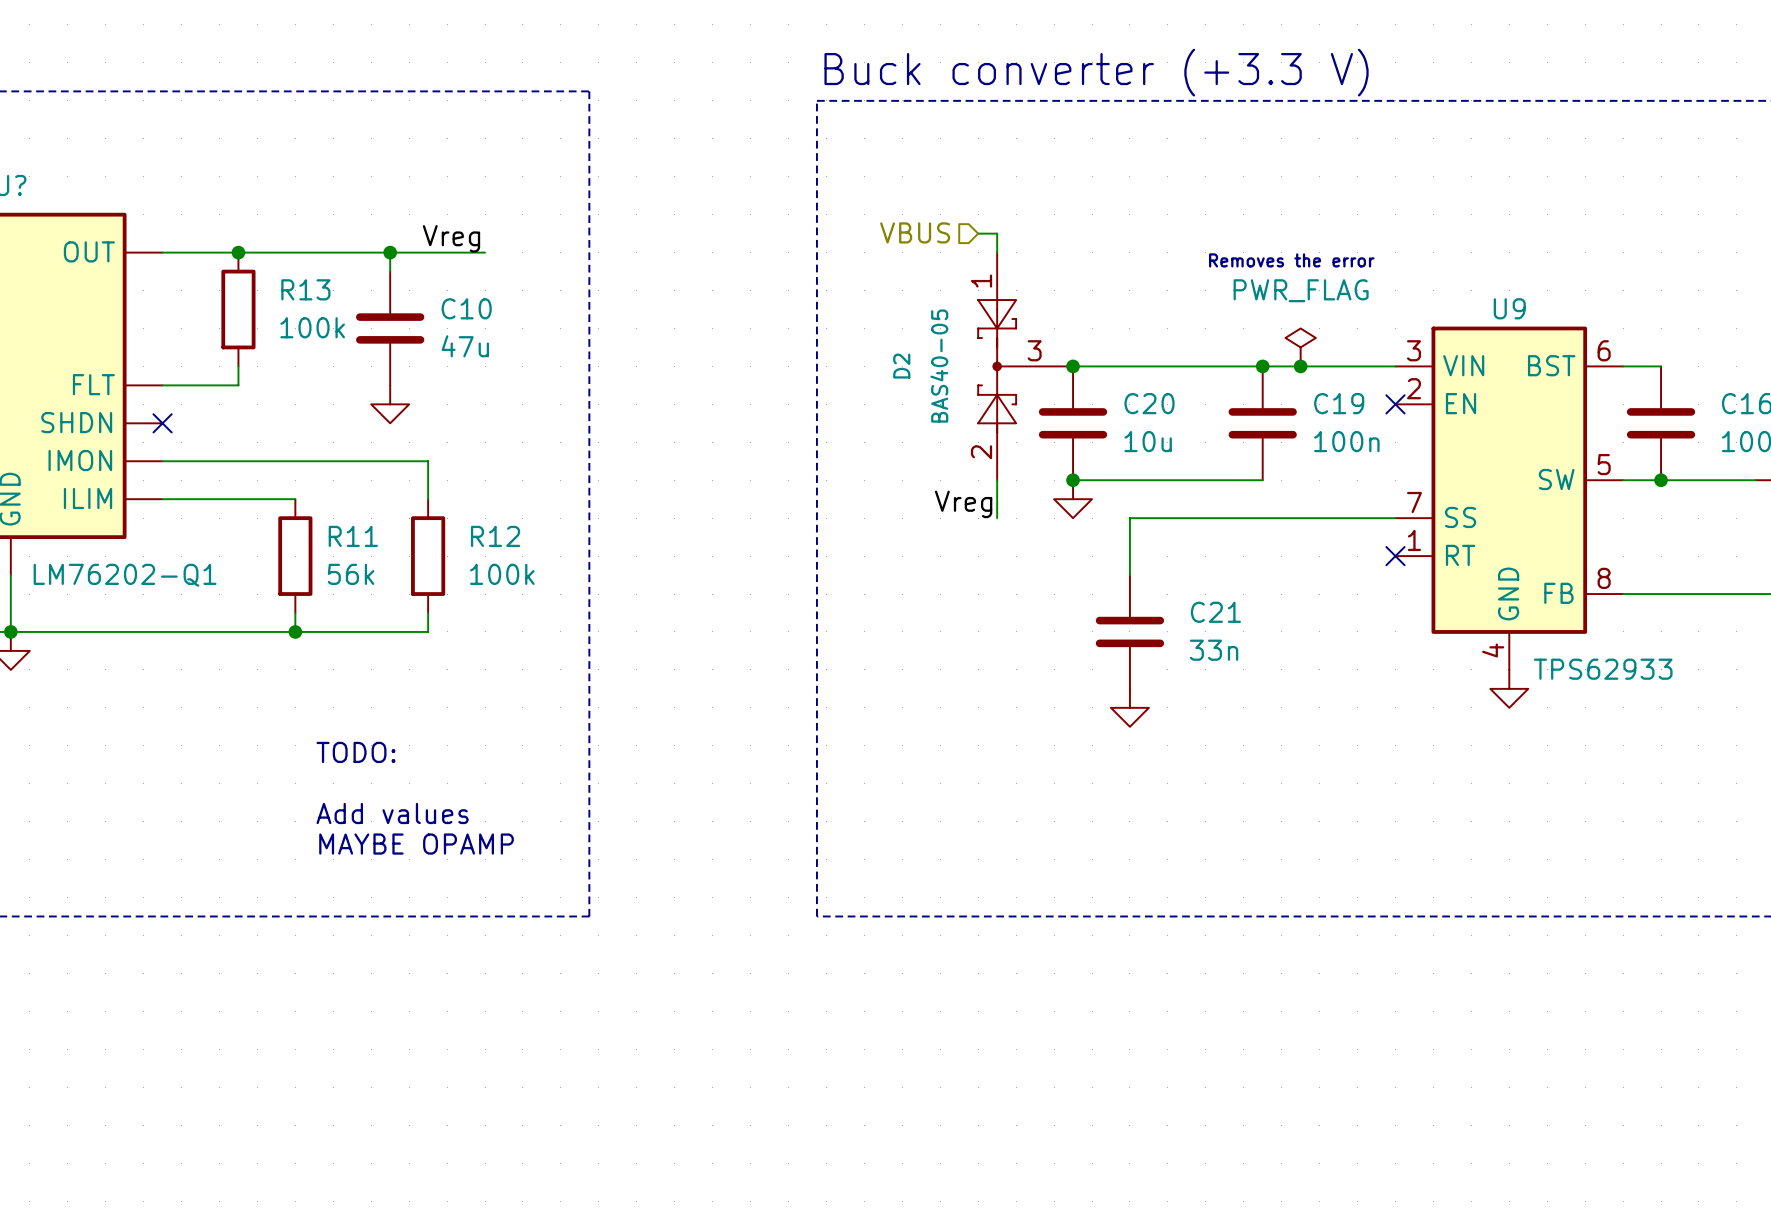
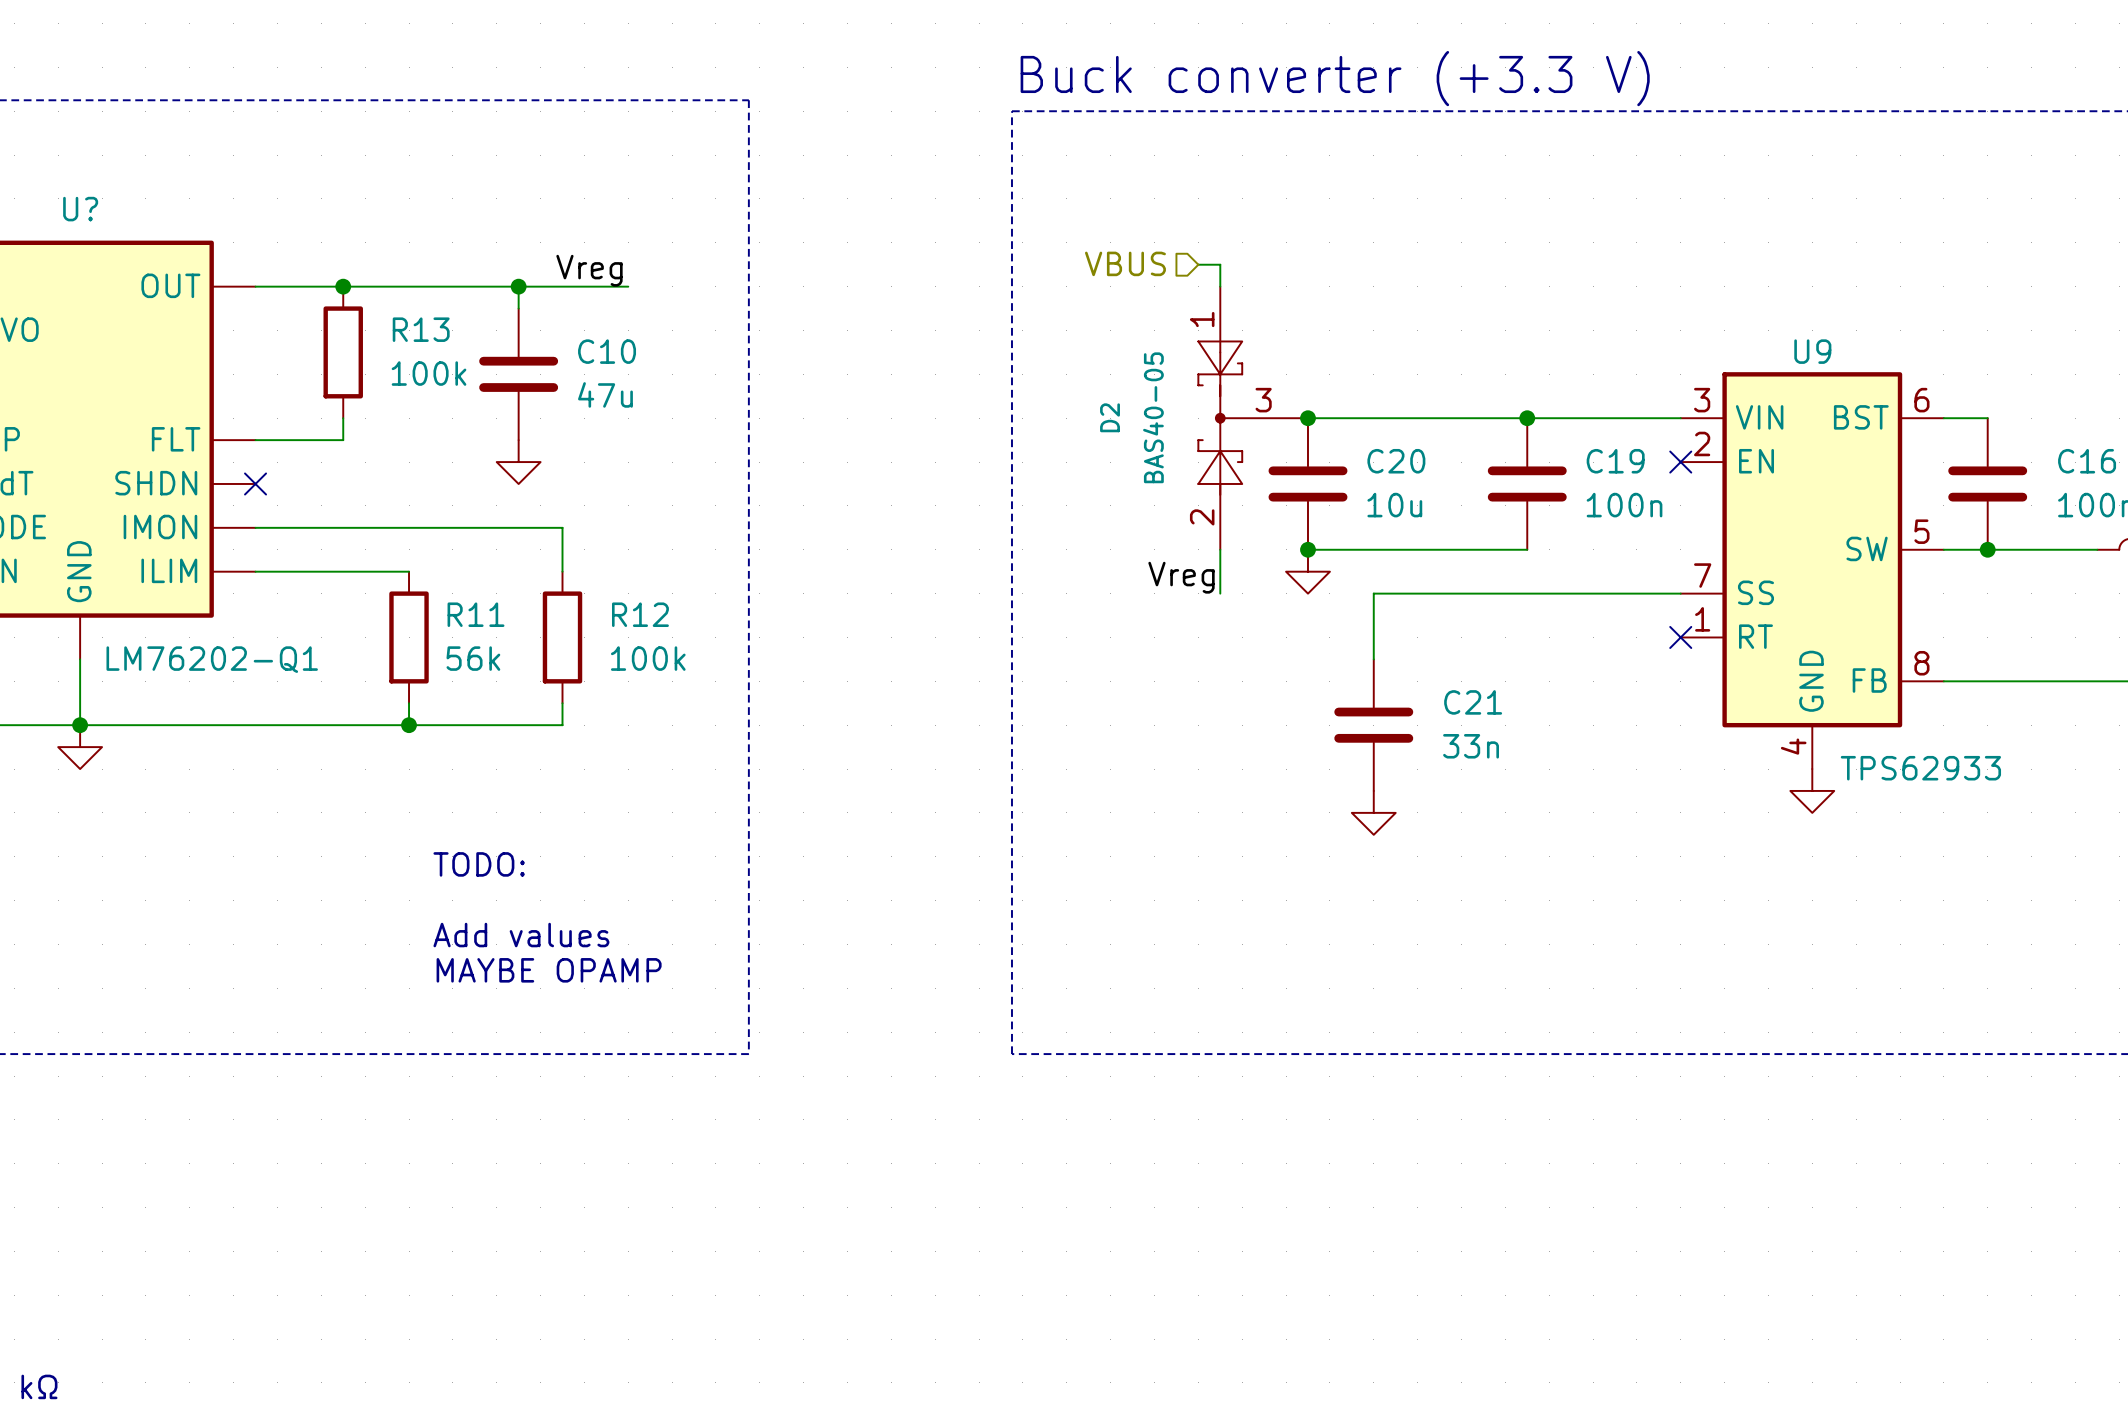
text: Removes the error (1291, 260) -> none
power symbol: PWR_FLAG (1300, 347) -> none
junction: (1300, 366) -> none

